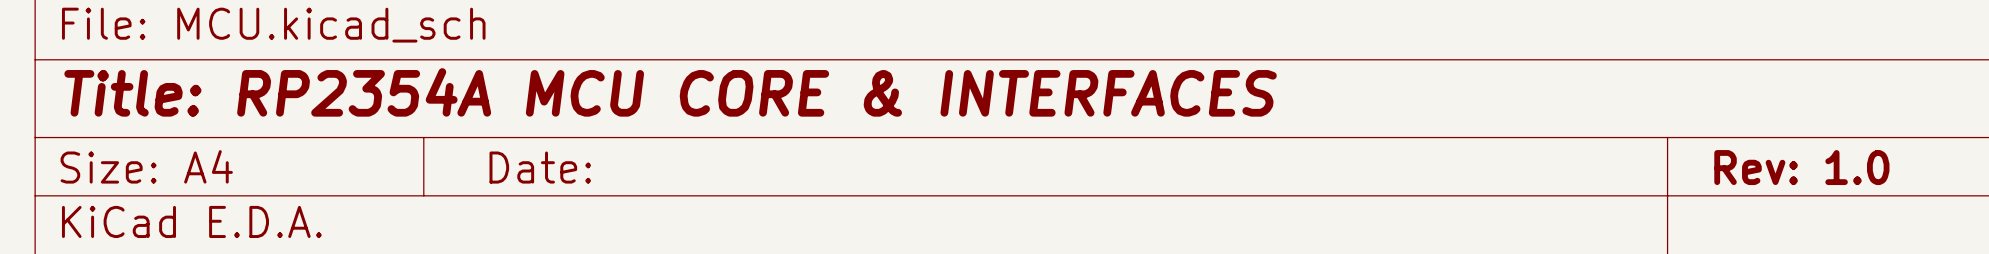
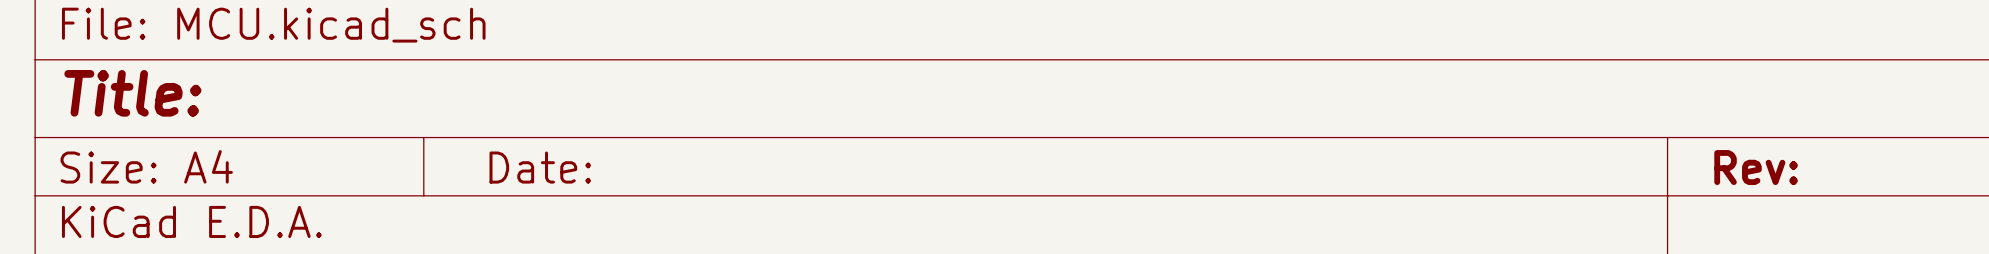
title block: Title: RP2354A MCU CORE & INTERFACES (670, 92) -> Title: (132, 93)
title block: Rev: 1.0 (1801, 167) -> Rev: (1756, 167)

